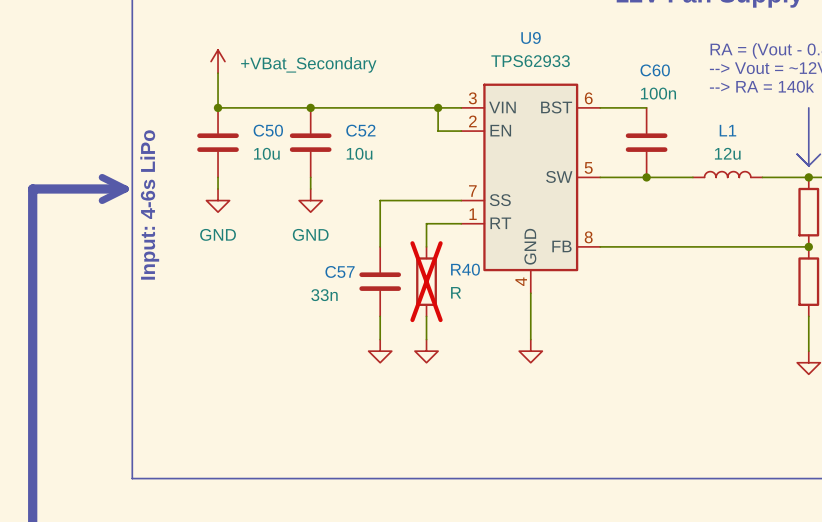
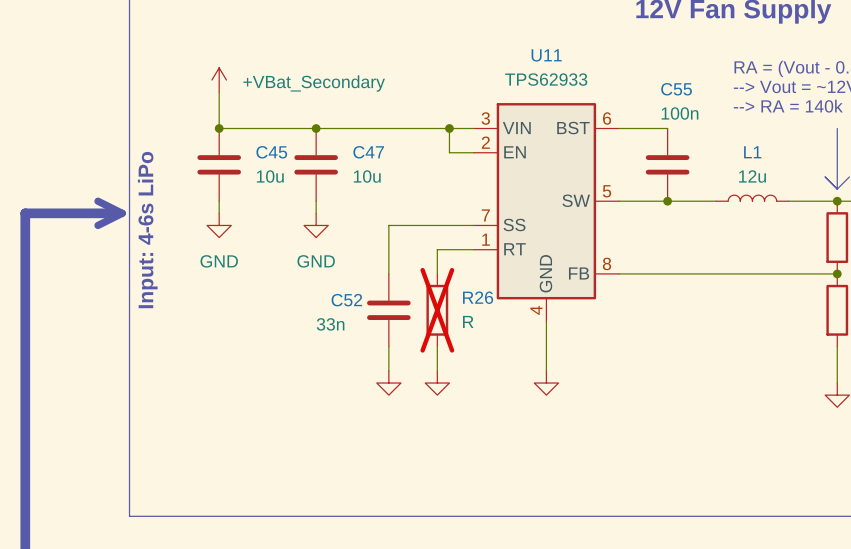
U9 name: U9 (531, 37) -> U11 (546, 55)
C60 name: C60 (655, 70) -> C55 (676, 89)
C50 name: C50 (268, 130) -> C45 (271, 152)
C52 name: C52 (360, 130) -> C47 (368, 152)
R40 name: R40 (465, 269) -> R26 (478, 297)
C57 name: C57 (340, 271) -> C52 (346, 300)

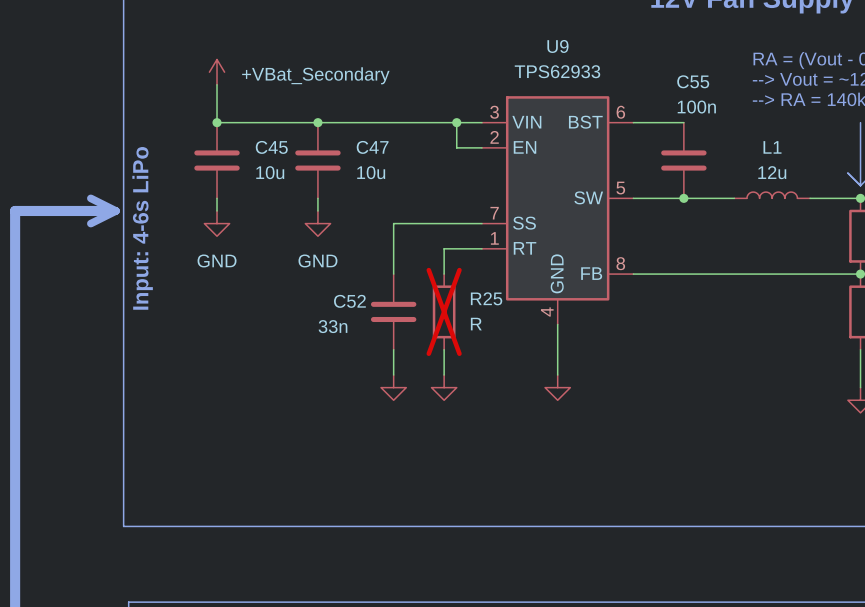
U11 name: U11 (546, 55) -> U9 (557, 46)
R26 name: R26 (478, 297) -> R25 (486, 298)

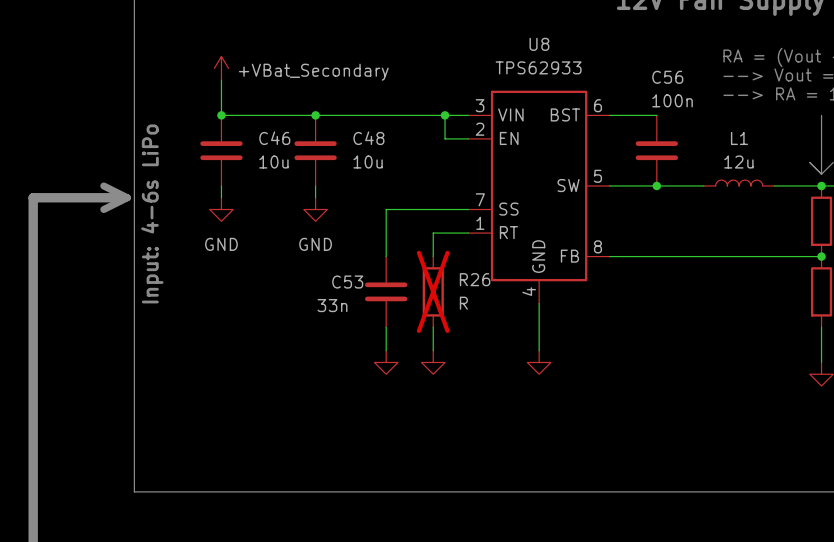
U9 name: U9 (557, 46) -> U8 (539, 44)
C55 name: C55 (693, 81) -> C56 (667, 77)
C45 name: C45 (271, 147) -> C46 (274, 138)
C47 name: C47 (372, 147) -> C48 (368, 138)
R25 name: R25 (486, 298) -> R26 (475, 279)
C52 name: C52 (349, 301) -> C53 (347, 282)

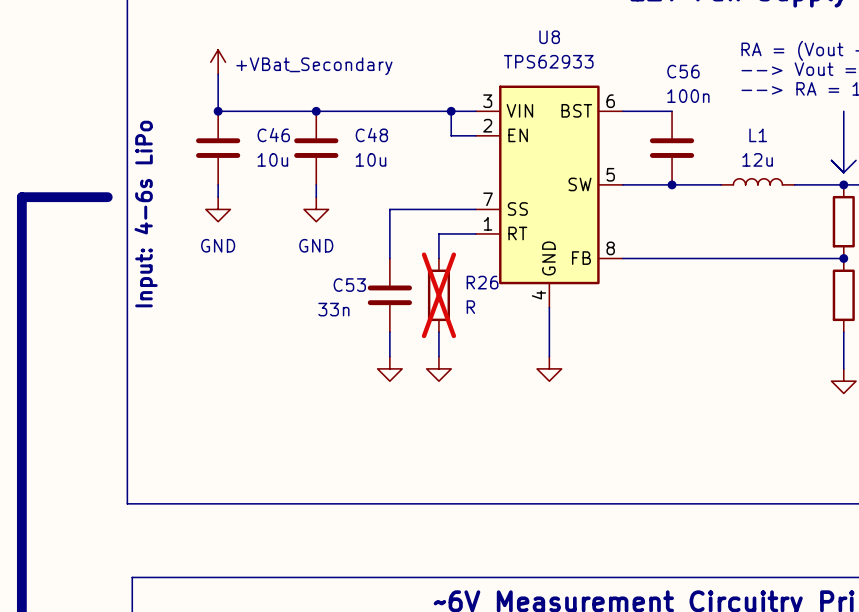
line: (103, 185) (127, 197) (103, 209) -> none

